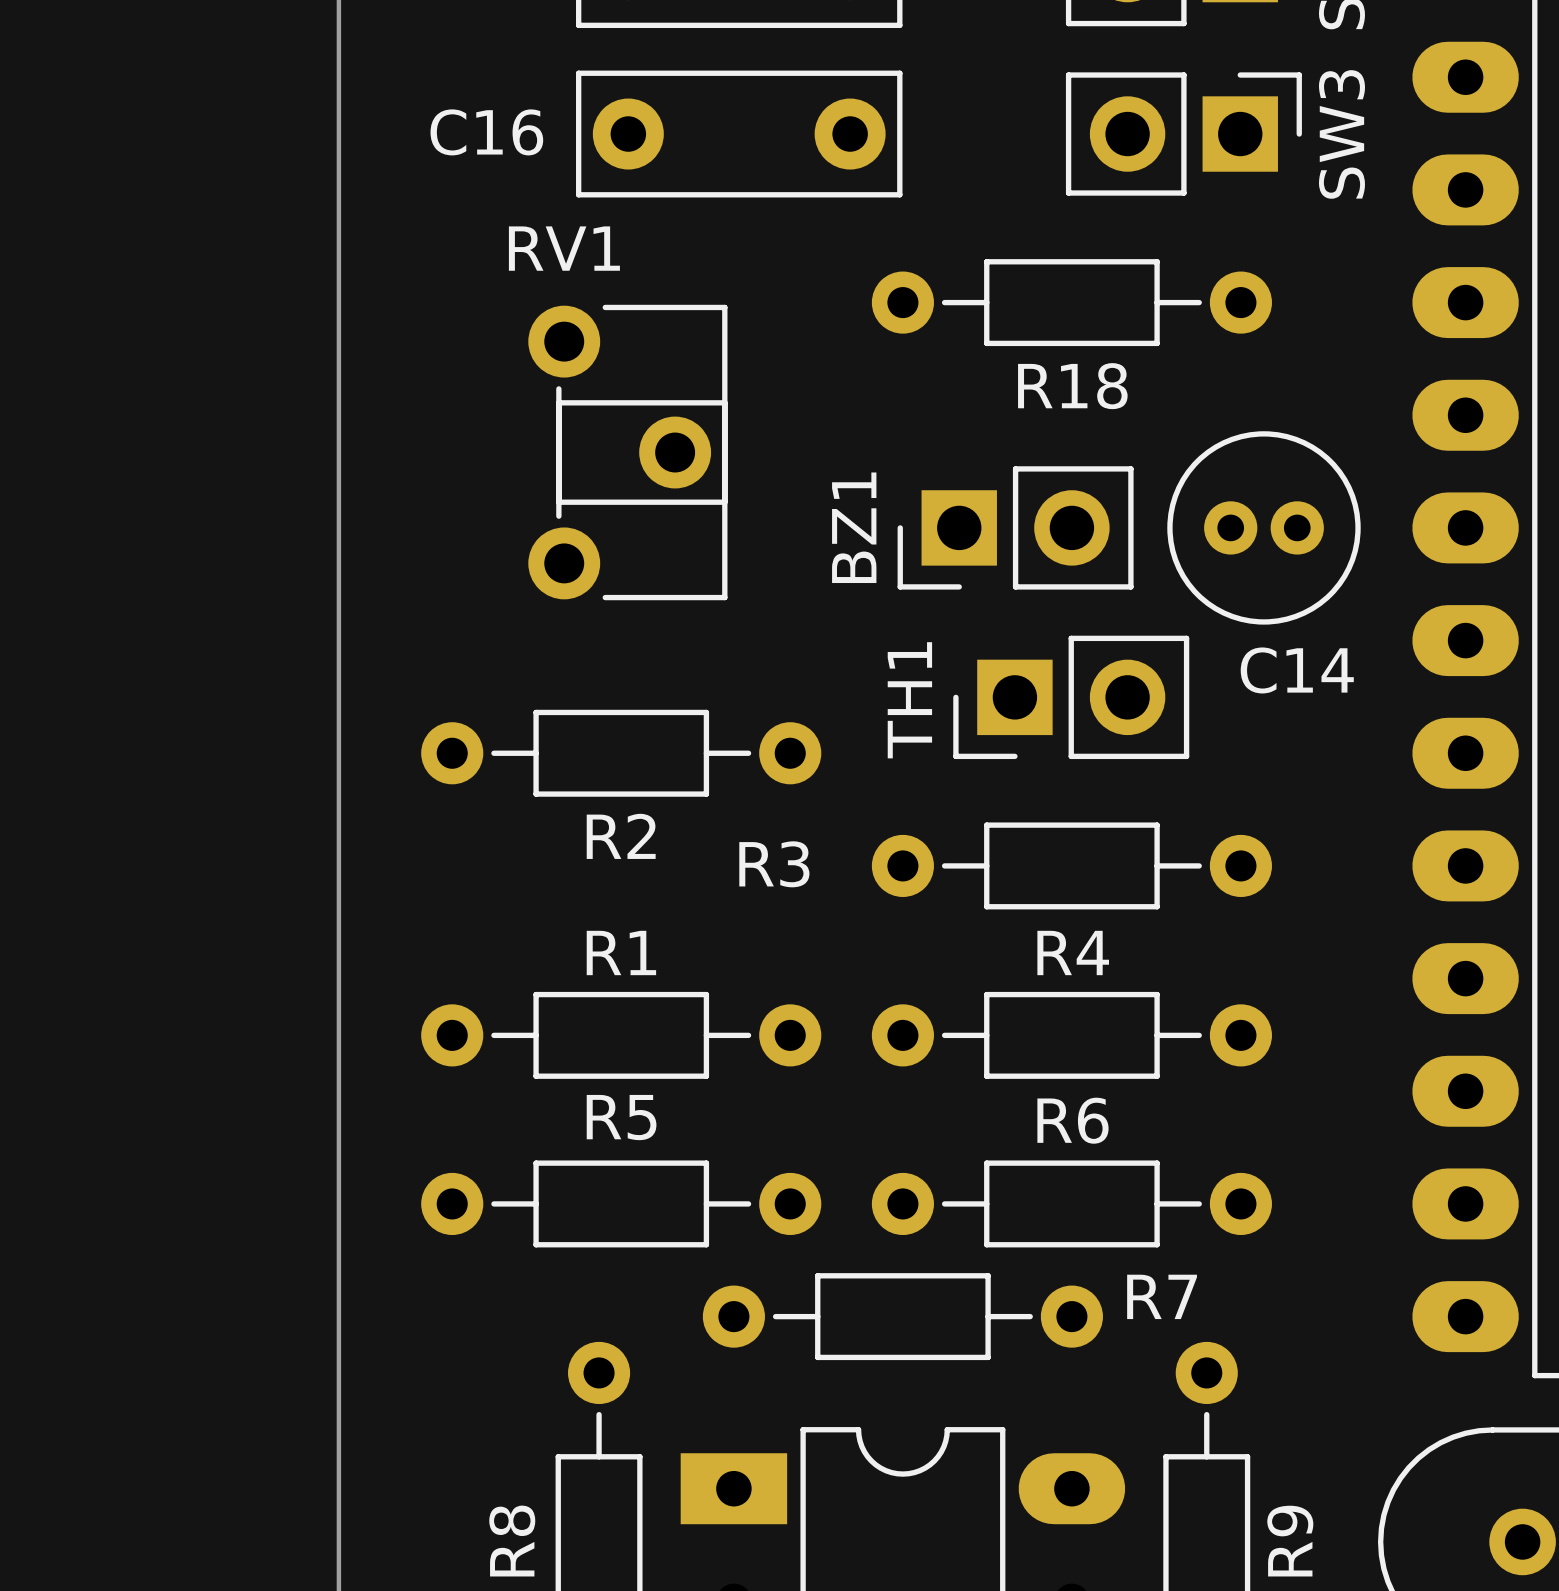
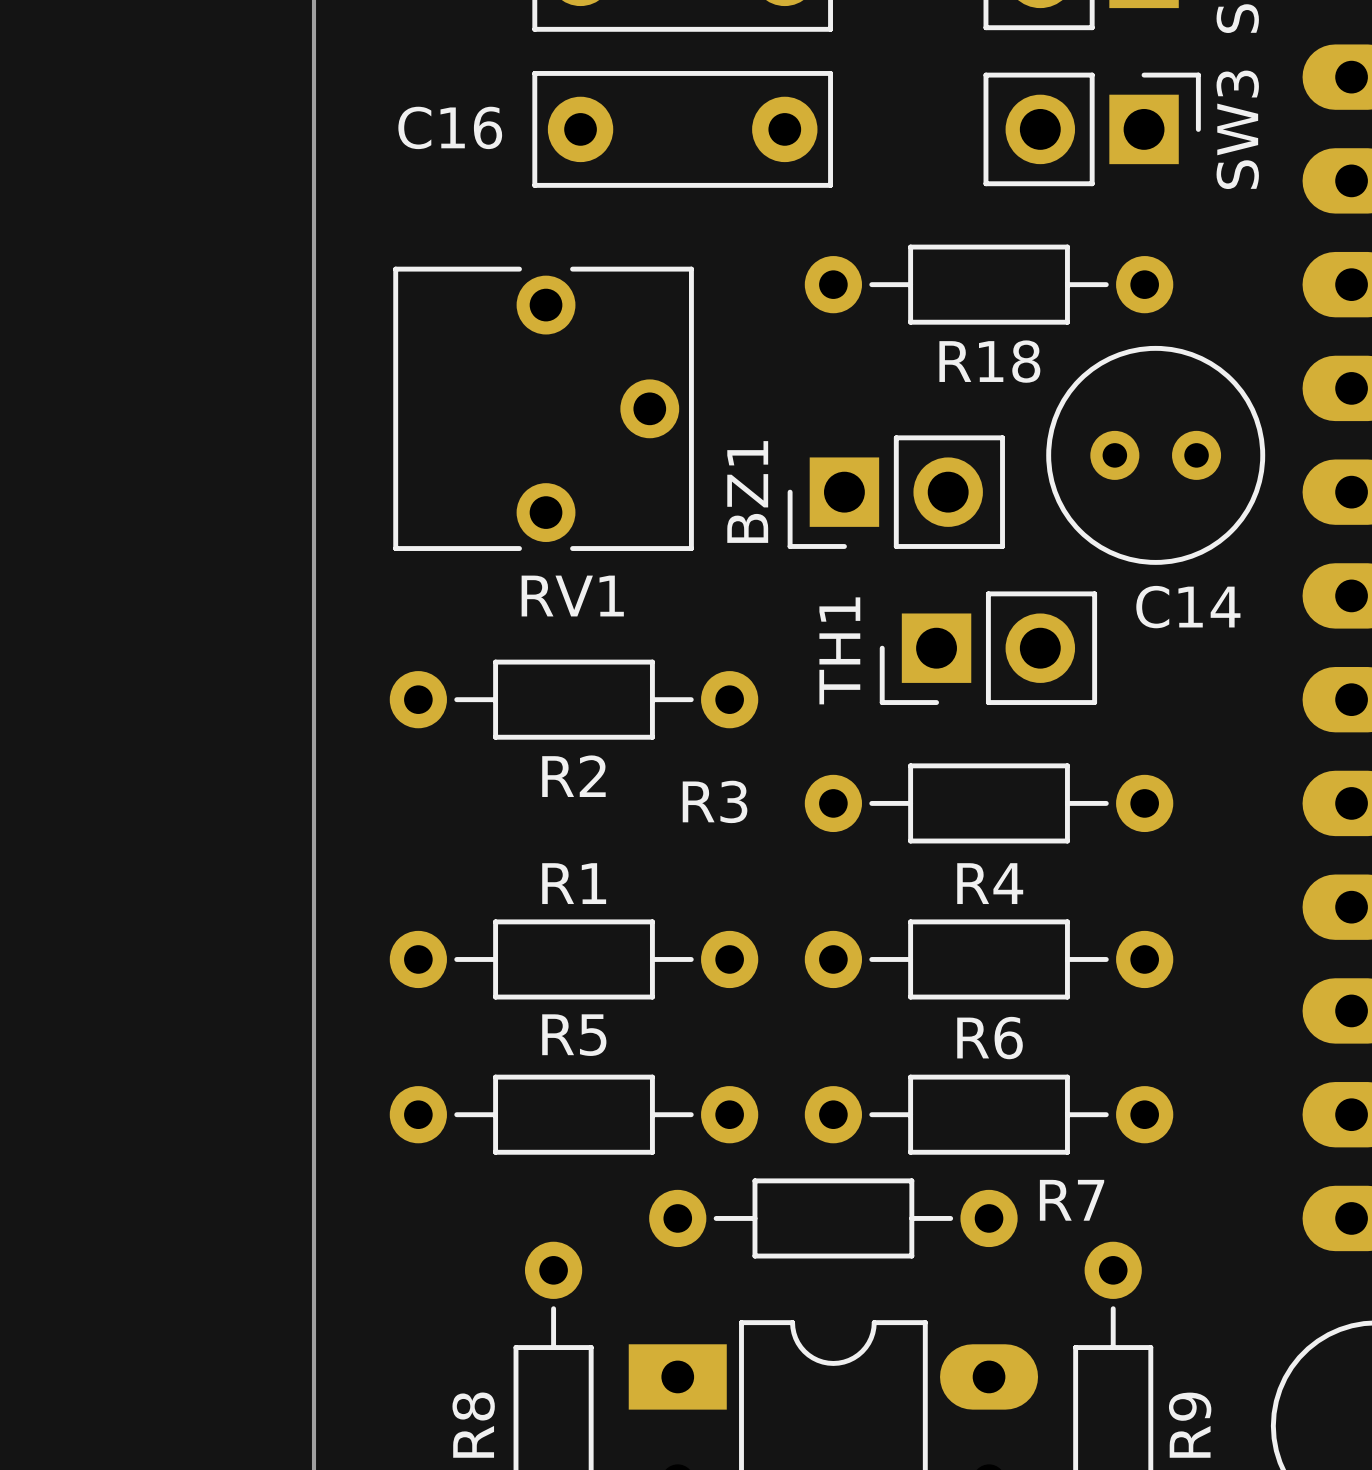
RV1 name position: RV1 (564, 248) -> RV1 (572, 596)
RV1 footprint: [528, 304, 728, 601] -> [393, 266, 694, 551]
C14 footprint: [1167, 431, 1361, 625] -> [1046, 345, 1266, 565]
BZ1 position: (1015, 527) -> (896, 492)

